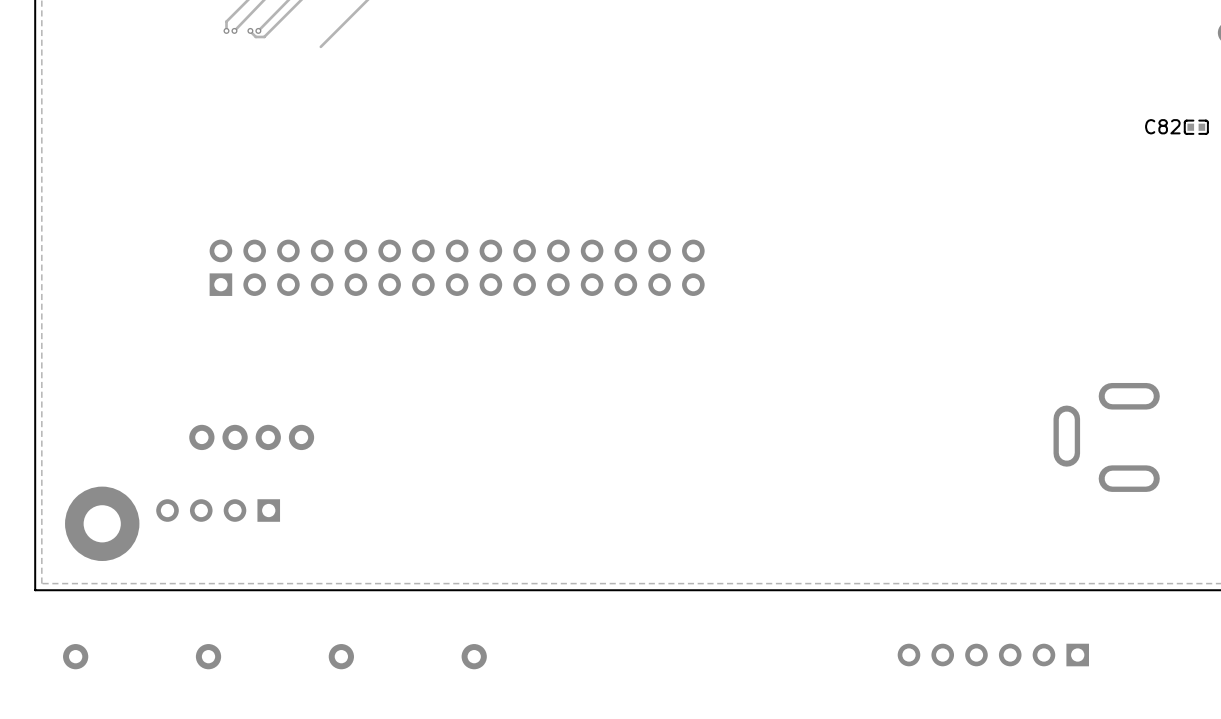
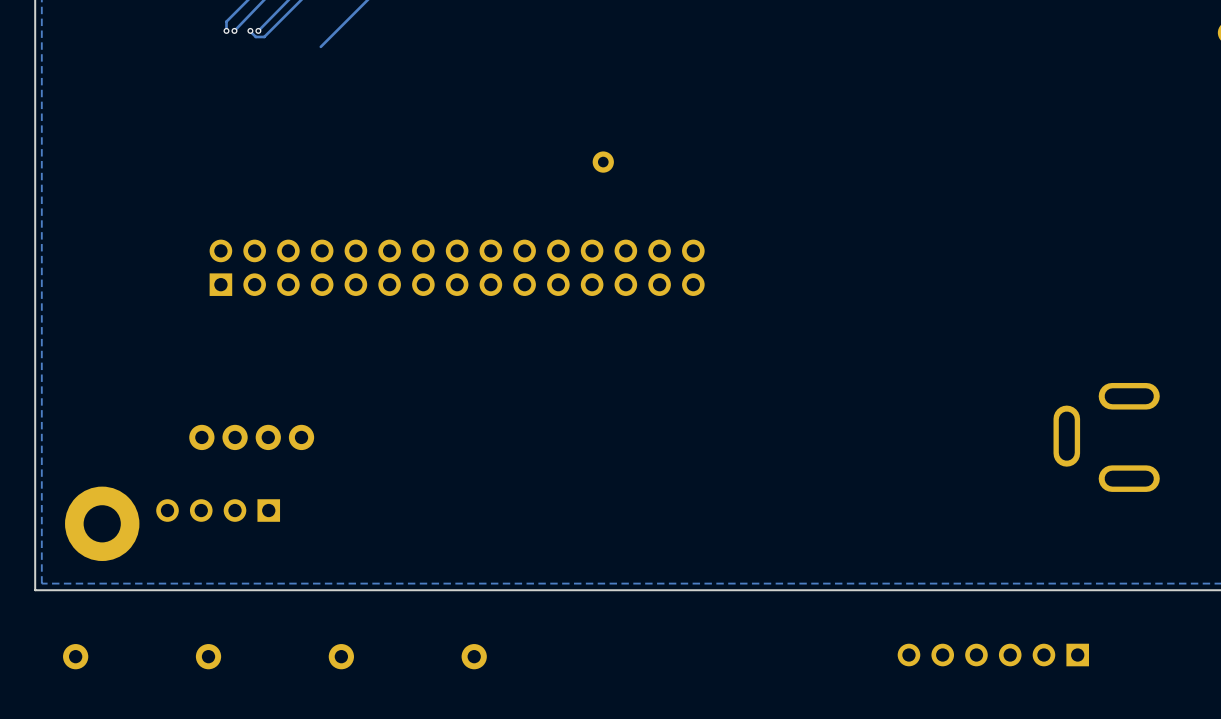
C82: (1196, 127) -> none
part: none -> (603, 162)

